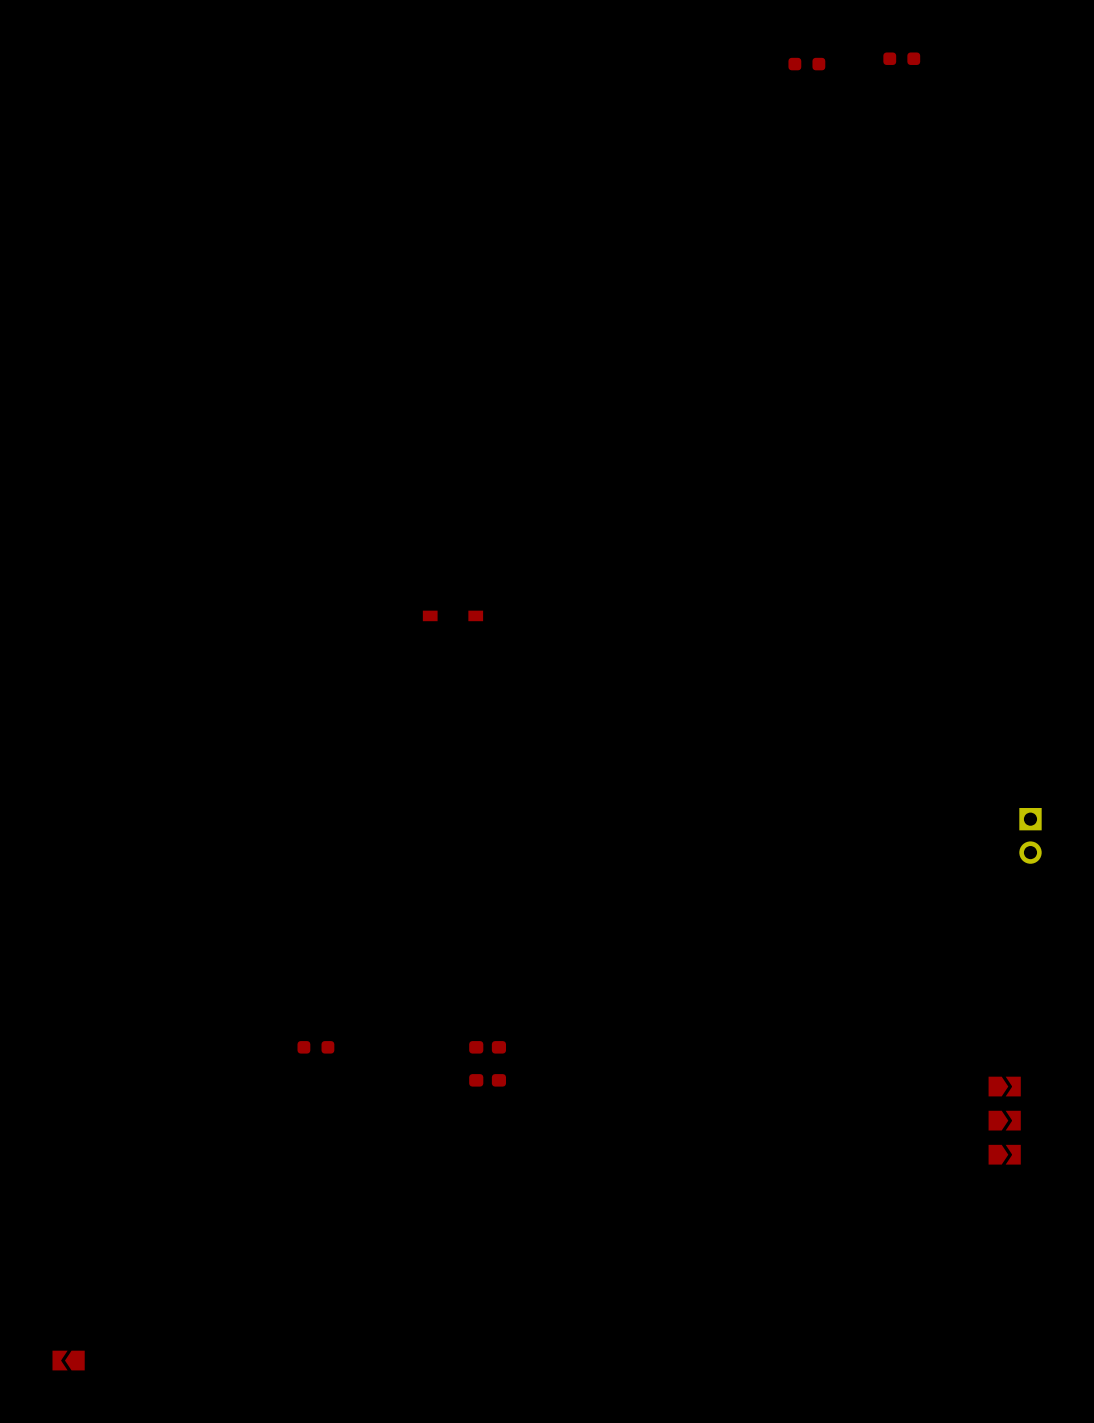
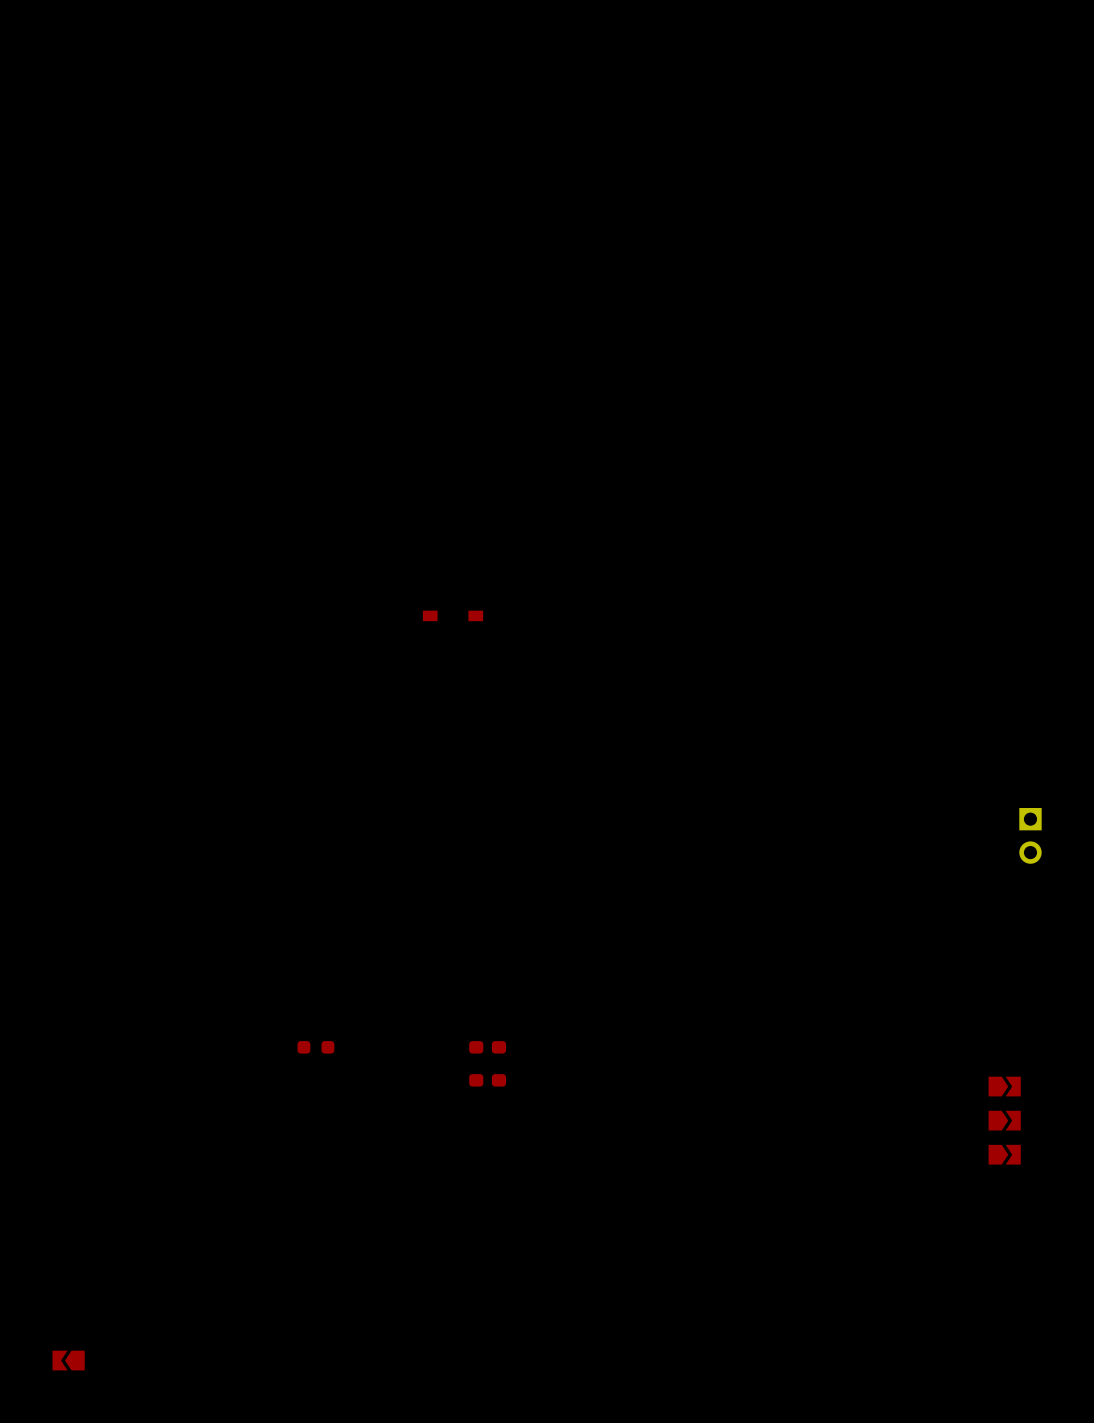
part: (901, 58) -> none
part: (806, 64) -> none

